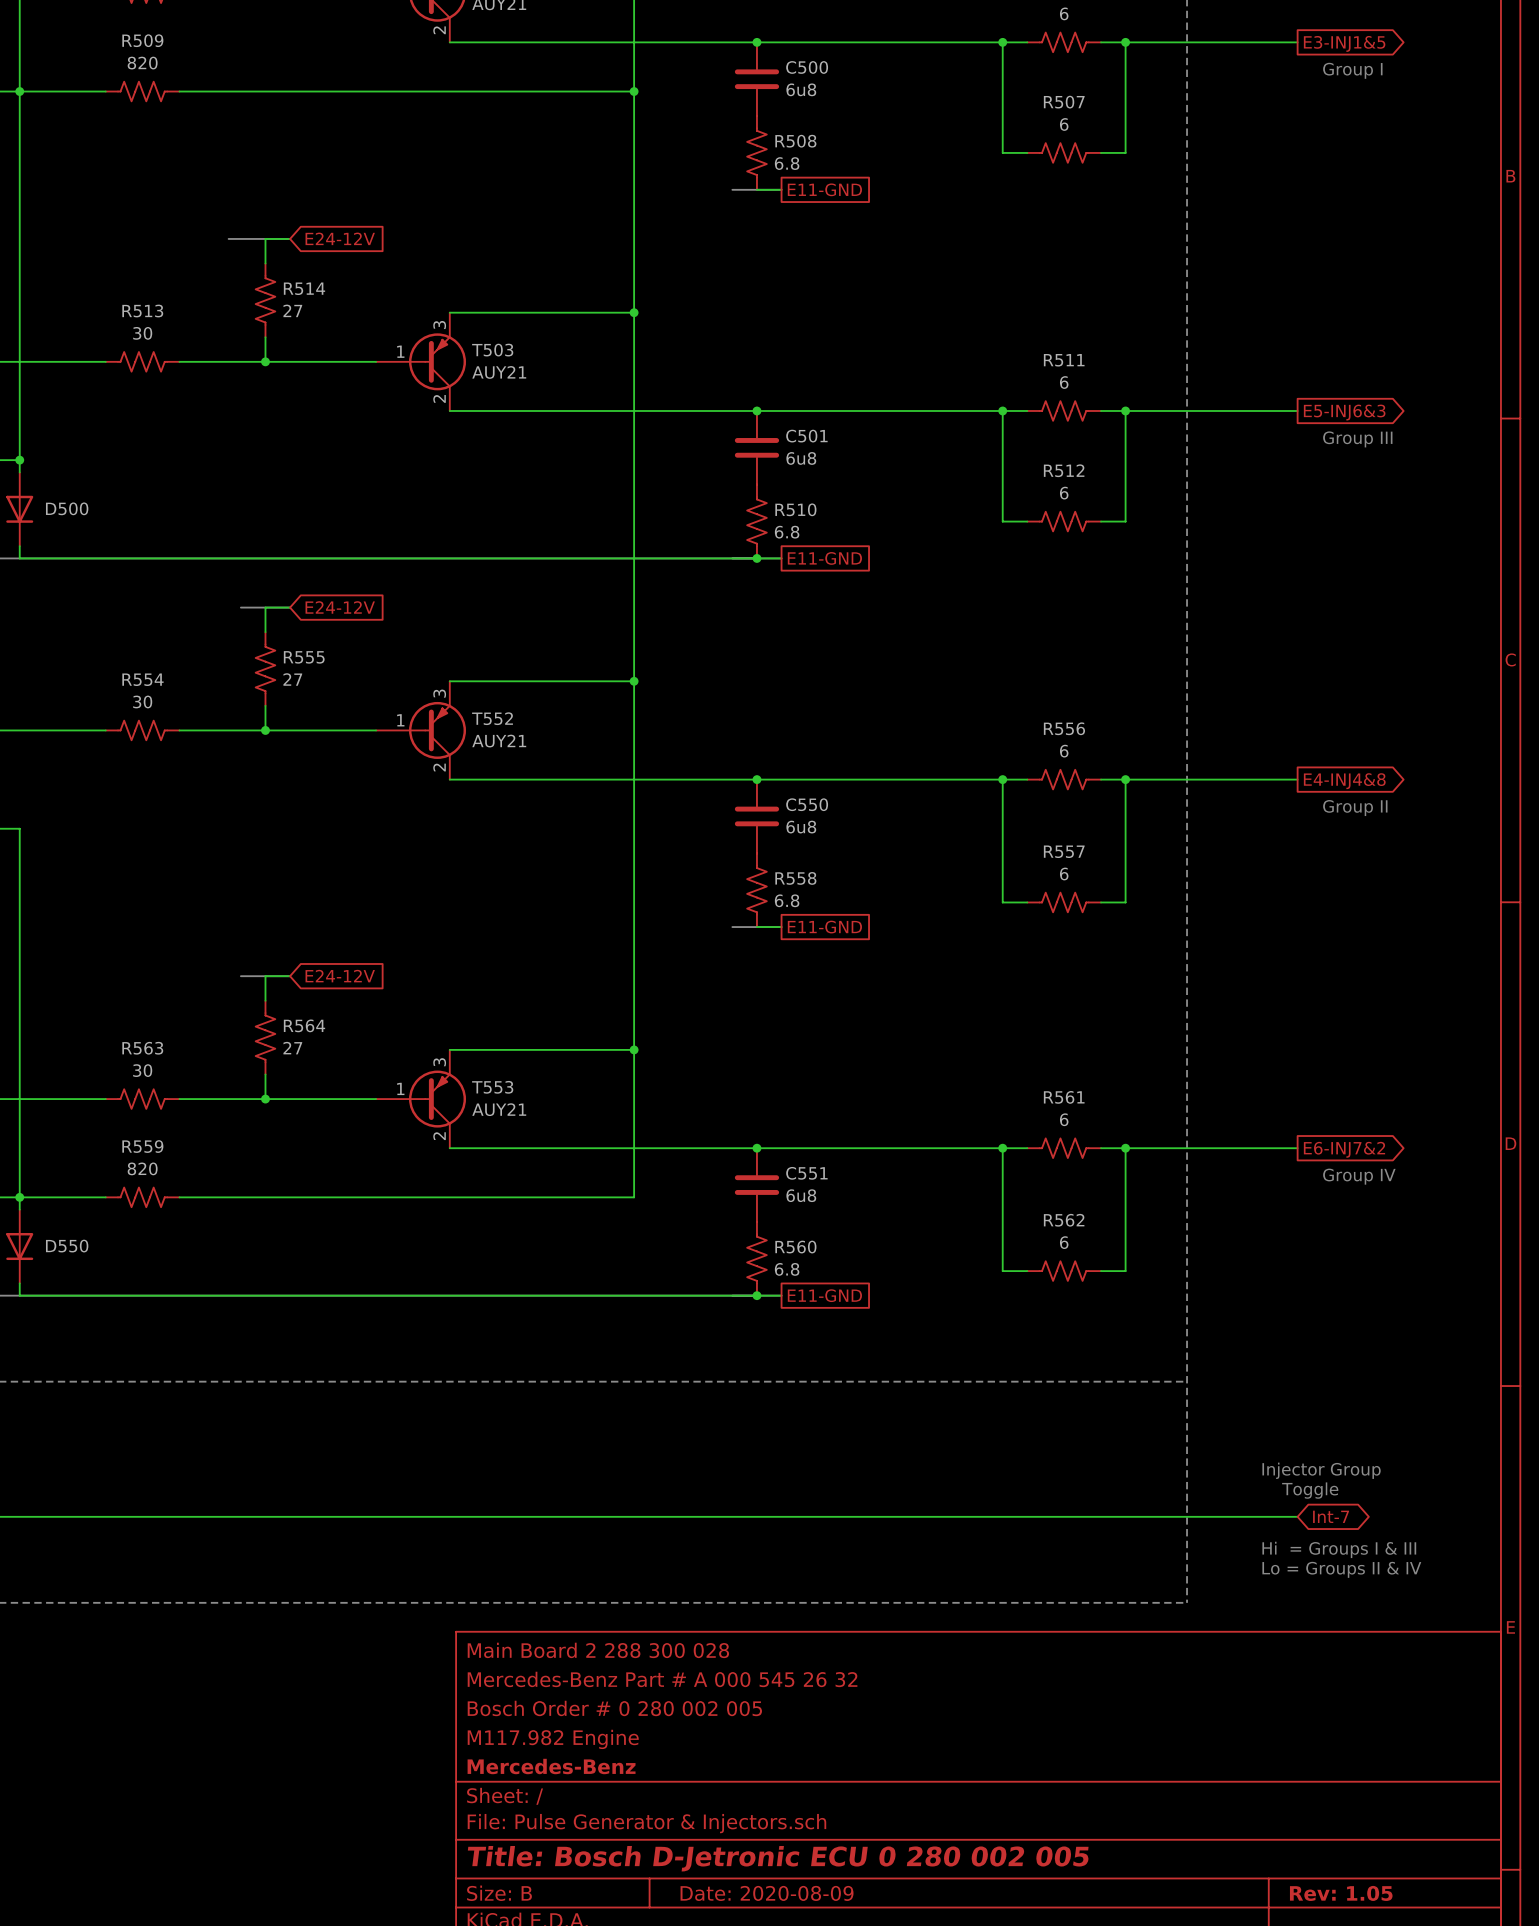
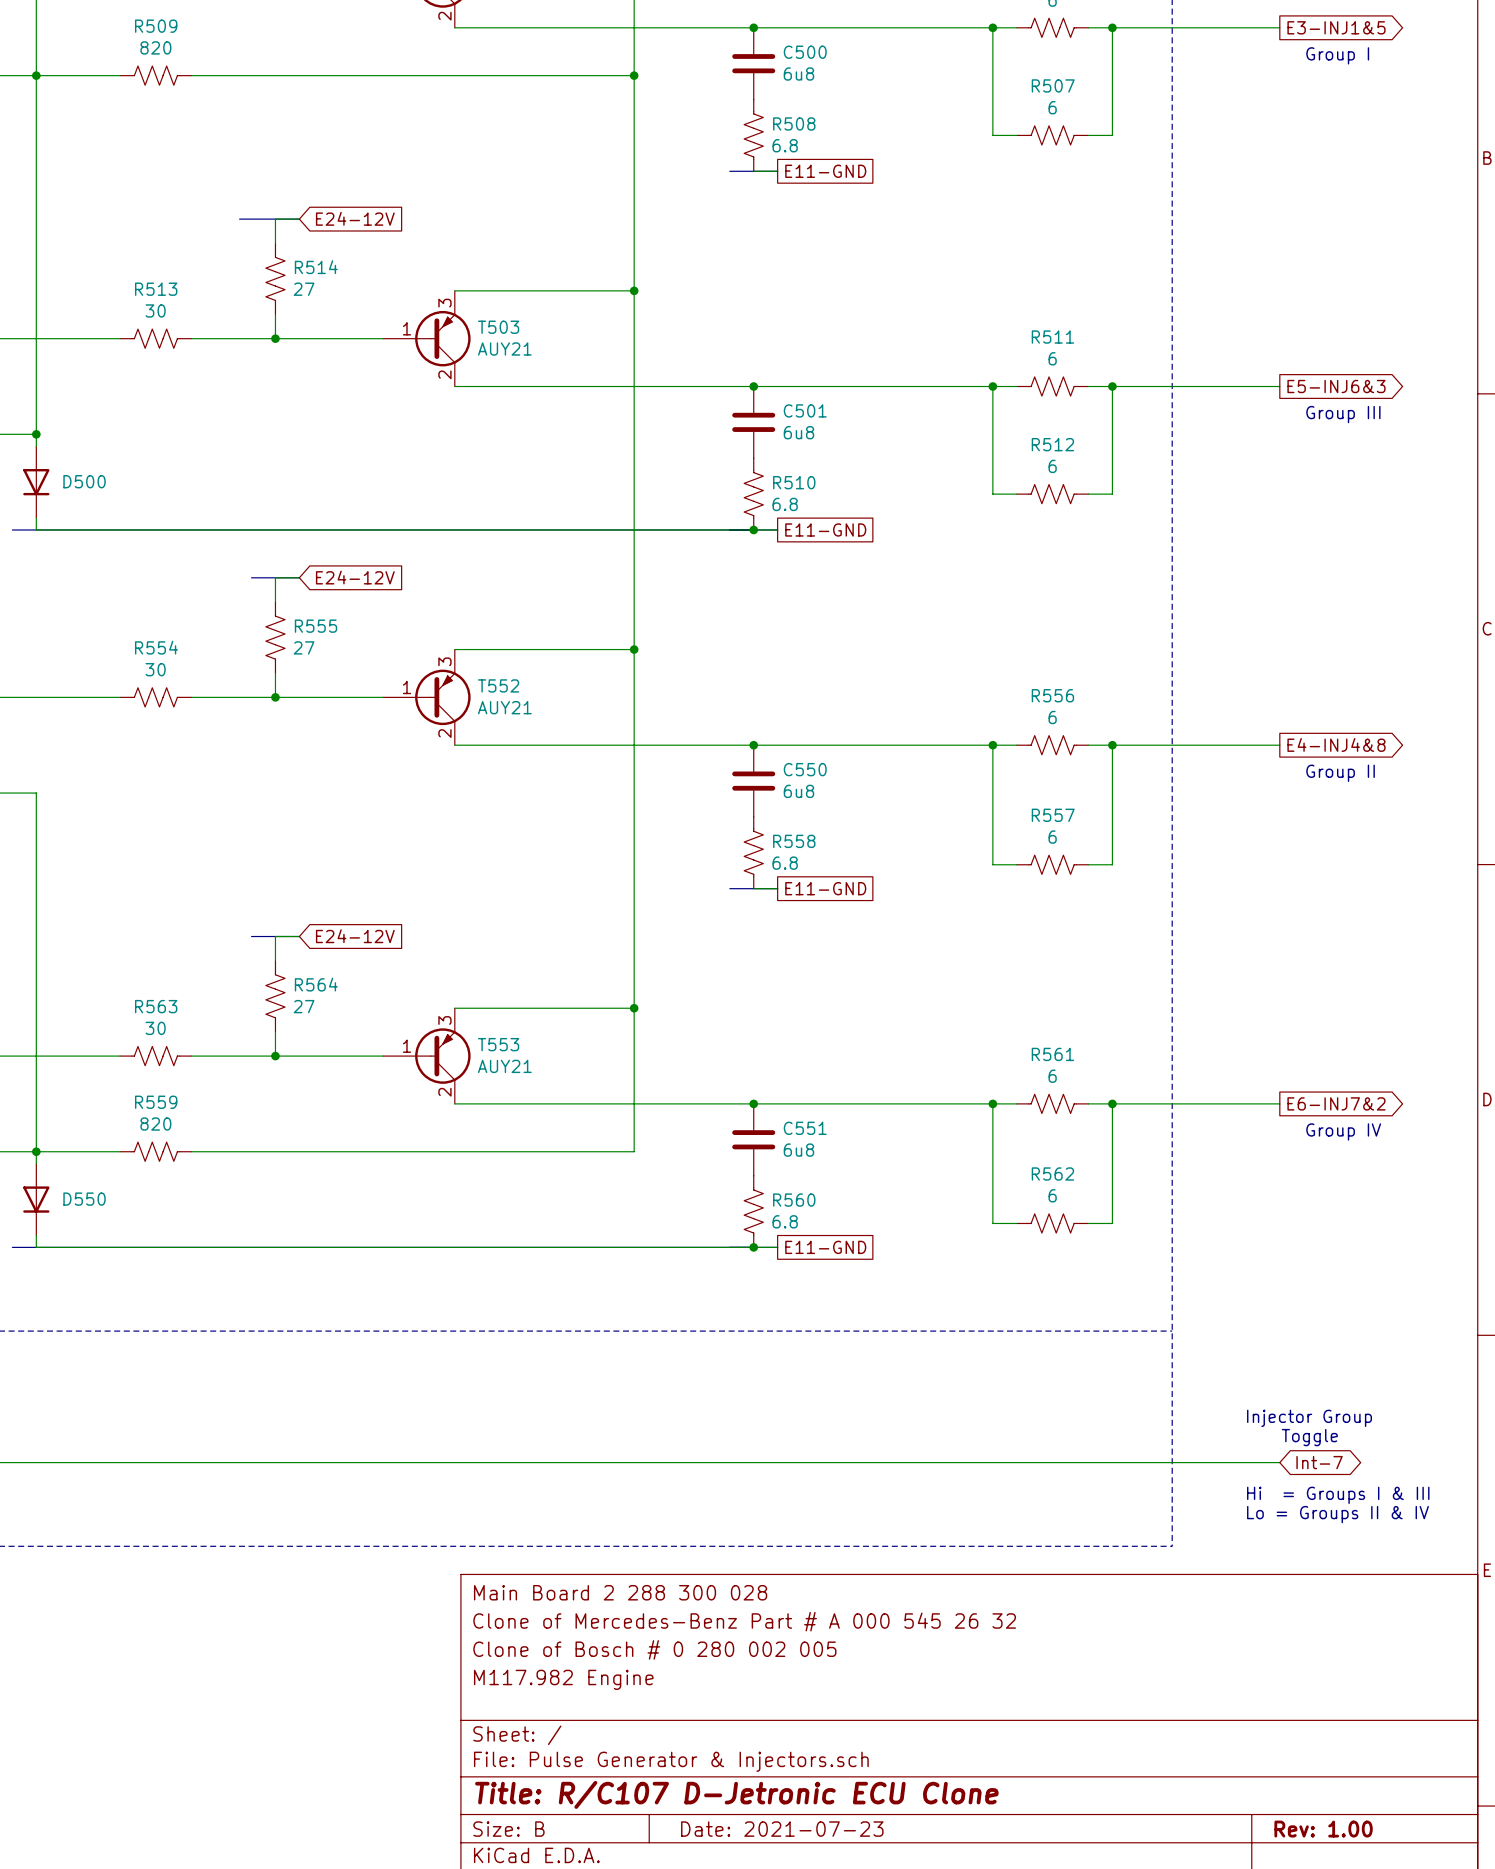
title block: Mercedes-Benz Part # A 000 545 26 32 (662, 1679) -> Clone of Mercedes-Benz Part # A 000 545 26 32 (744, 1621)
title block: Bosch Order # 0 280 002 005 (614, 1708) -> Clone of Bosch # 0 280 002 005 (654, 1649)
title block: Mercedes-Benz (551, 1766) -> none
title block: Title: Bosch D-Jetronic ECU 0 280 002 005 (778, 1858) -> Title: R/C107 D-Jetronic ECU Clone (736, 1794)
title block: Date: 2020-08-09 (767, 1893) -> Date: 2021-07-23 (782, 1829)
title block: Rev: 1.05 (1341, 1893) -> Rev: 1.00 (1323, 1829)

